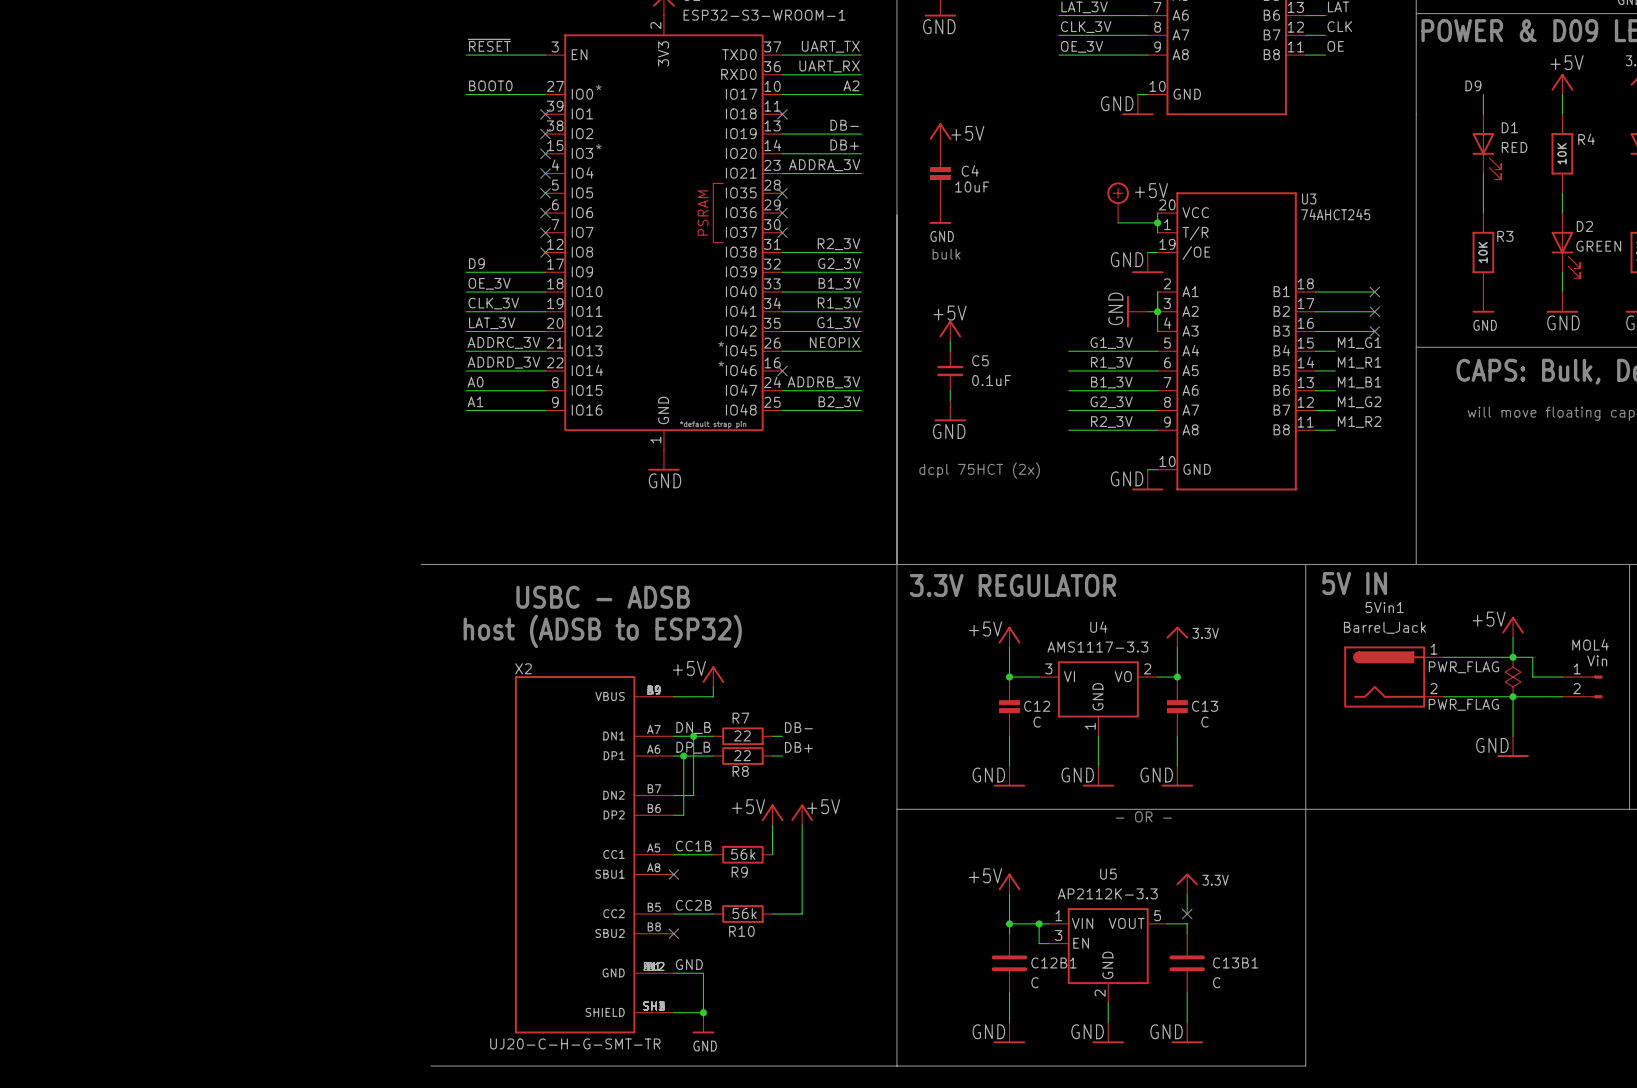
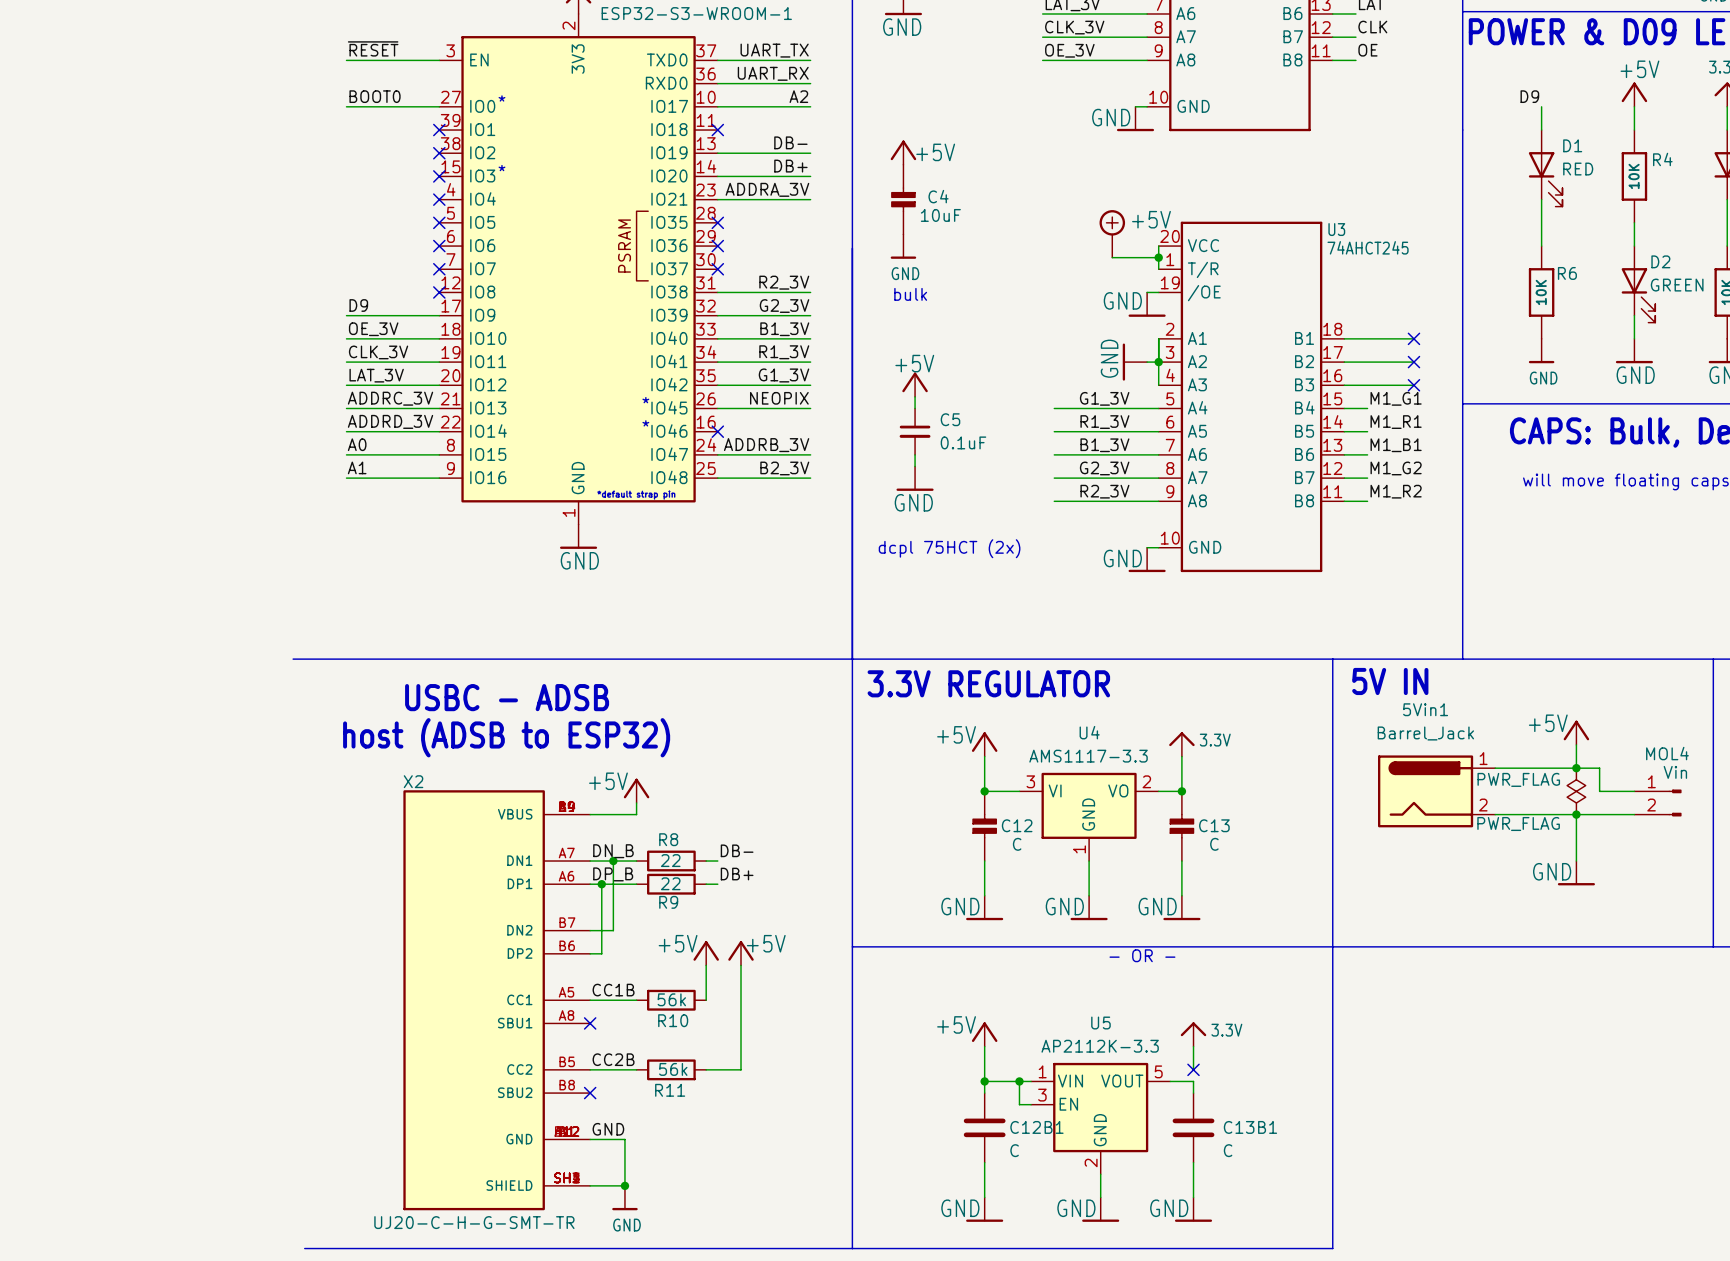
R3 name: R3 (1505, 236) -> R6 (1567, 273)
R7 name: R7 (740, 718) -> R8 (668, 839)
R8 name: R8 (740, 771) -> R9 (668, 902)
R9 name: R9 (739, 872) -> R10 (673, 1020)
R10 name: R10 (741, 931) -> R11 (670, 1090)

